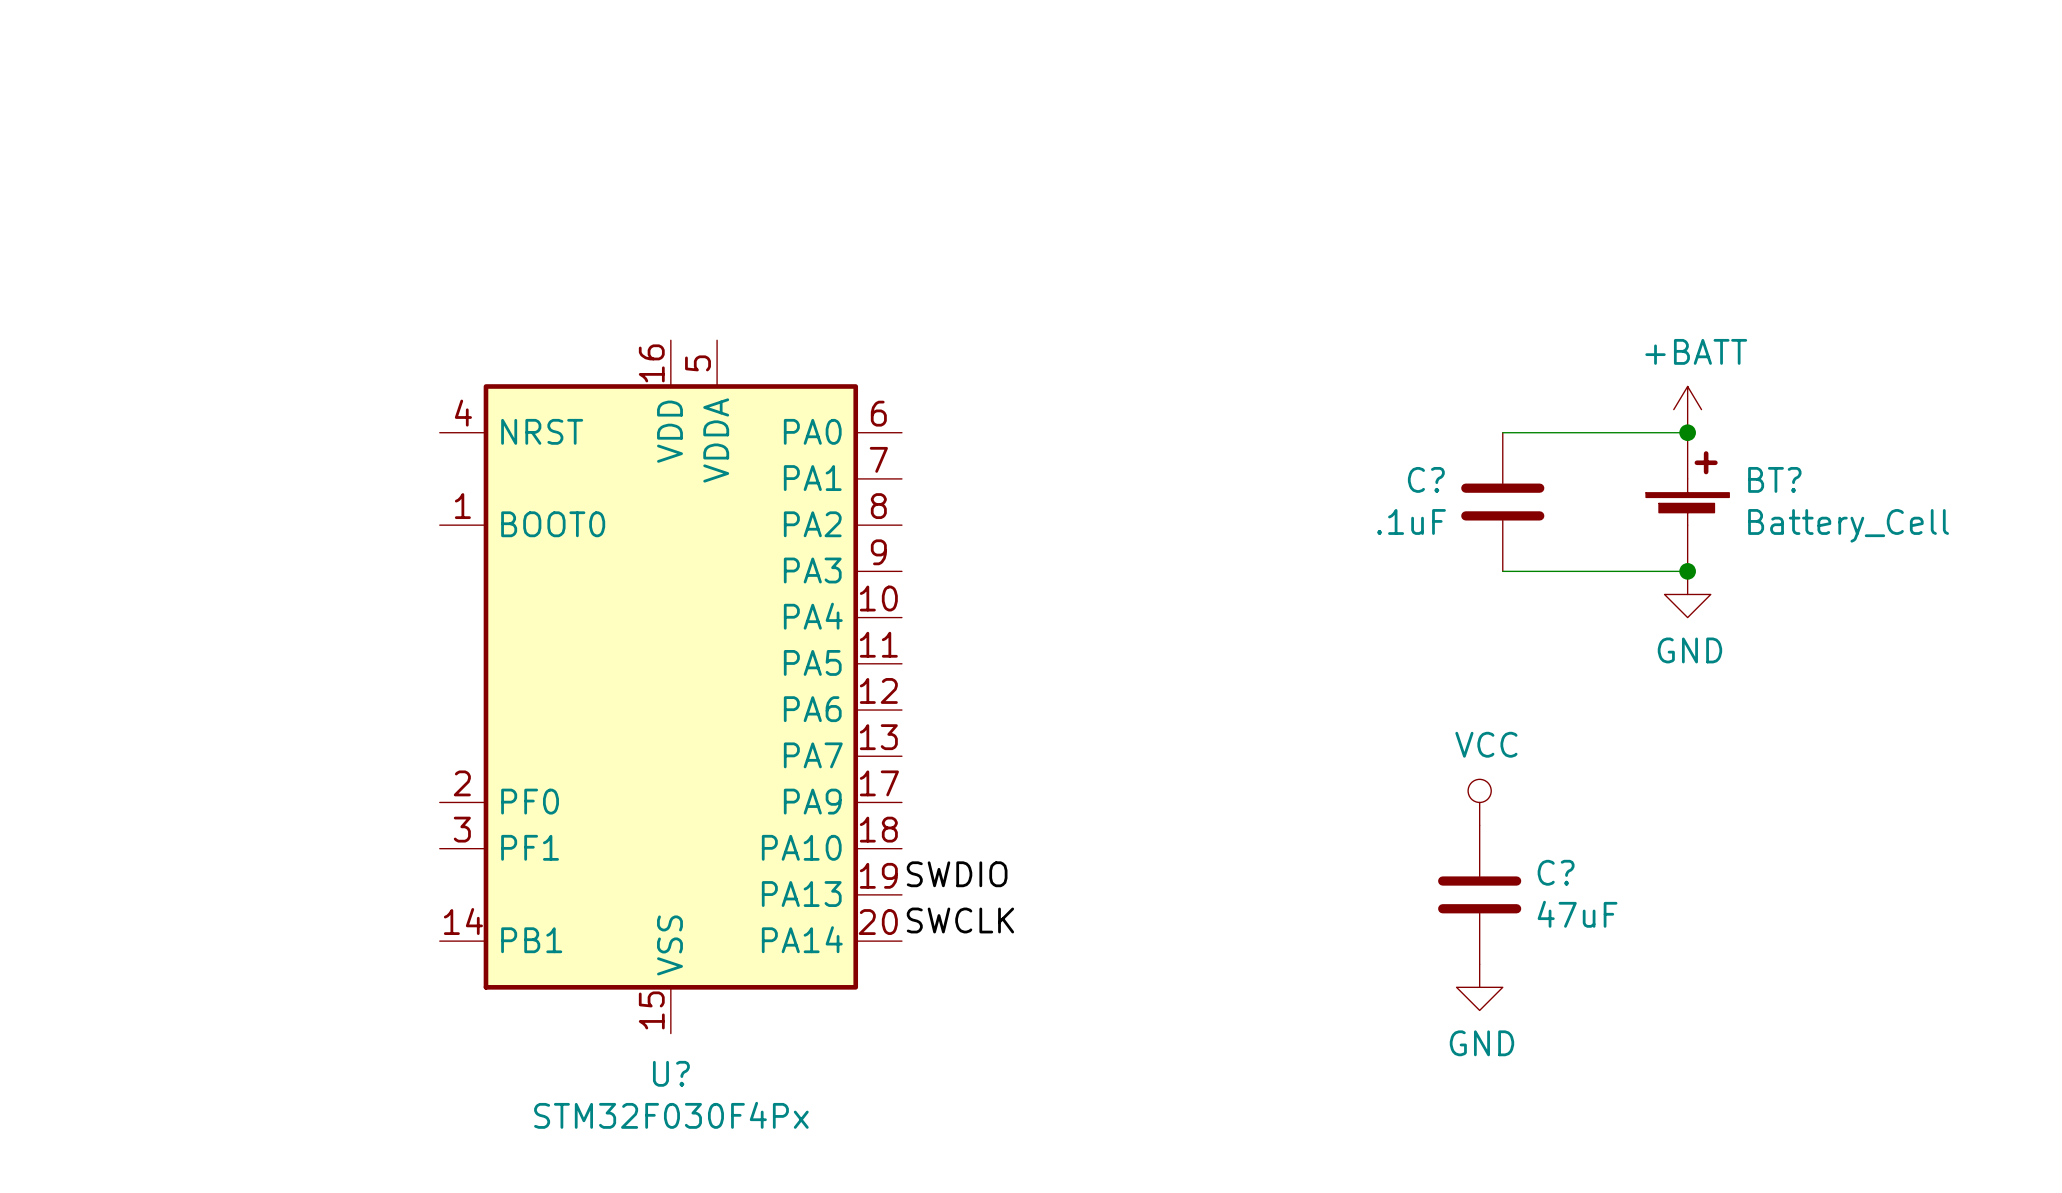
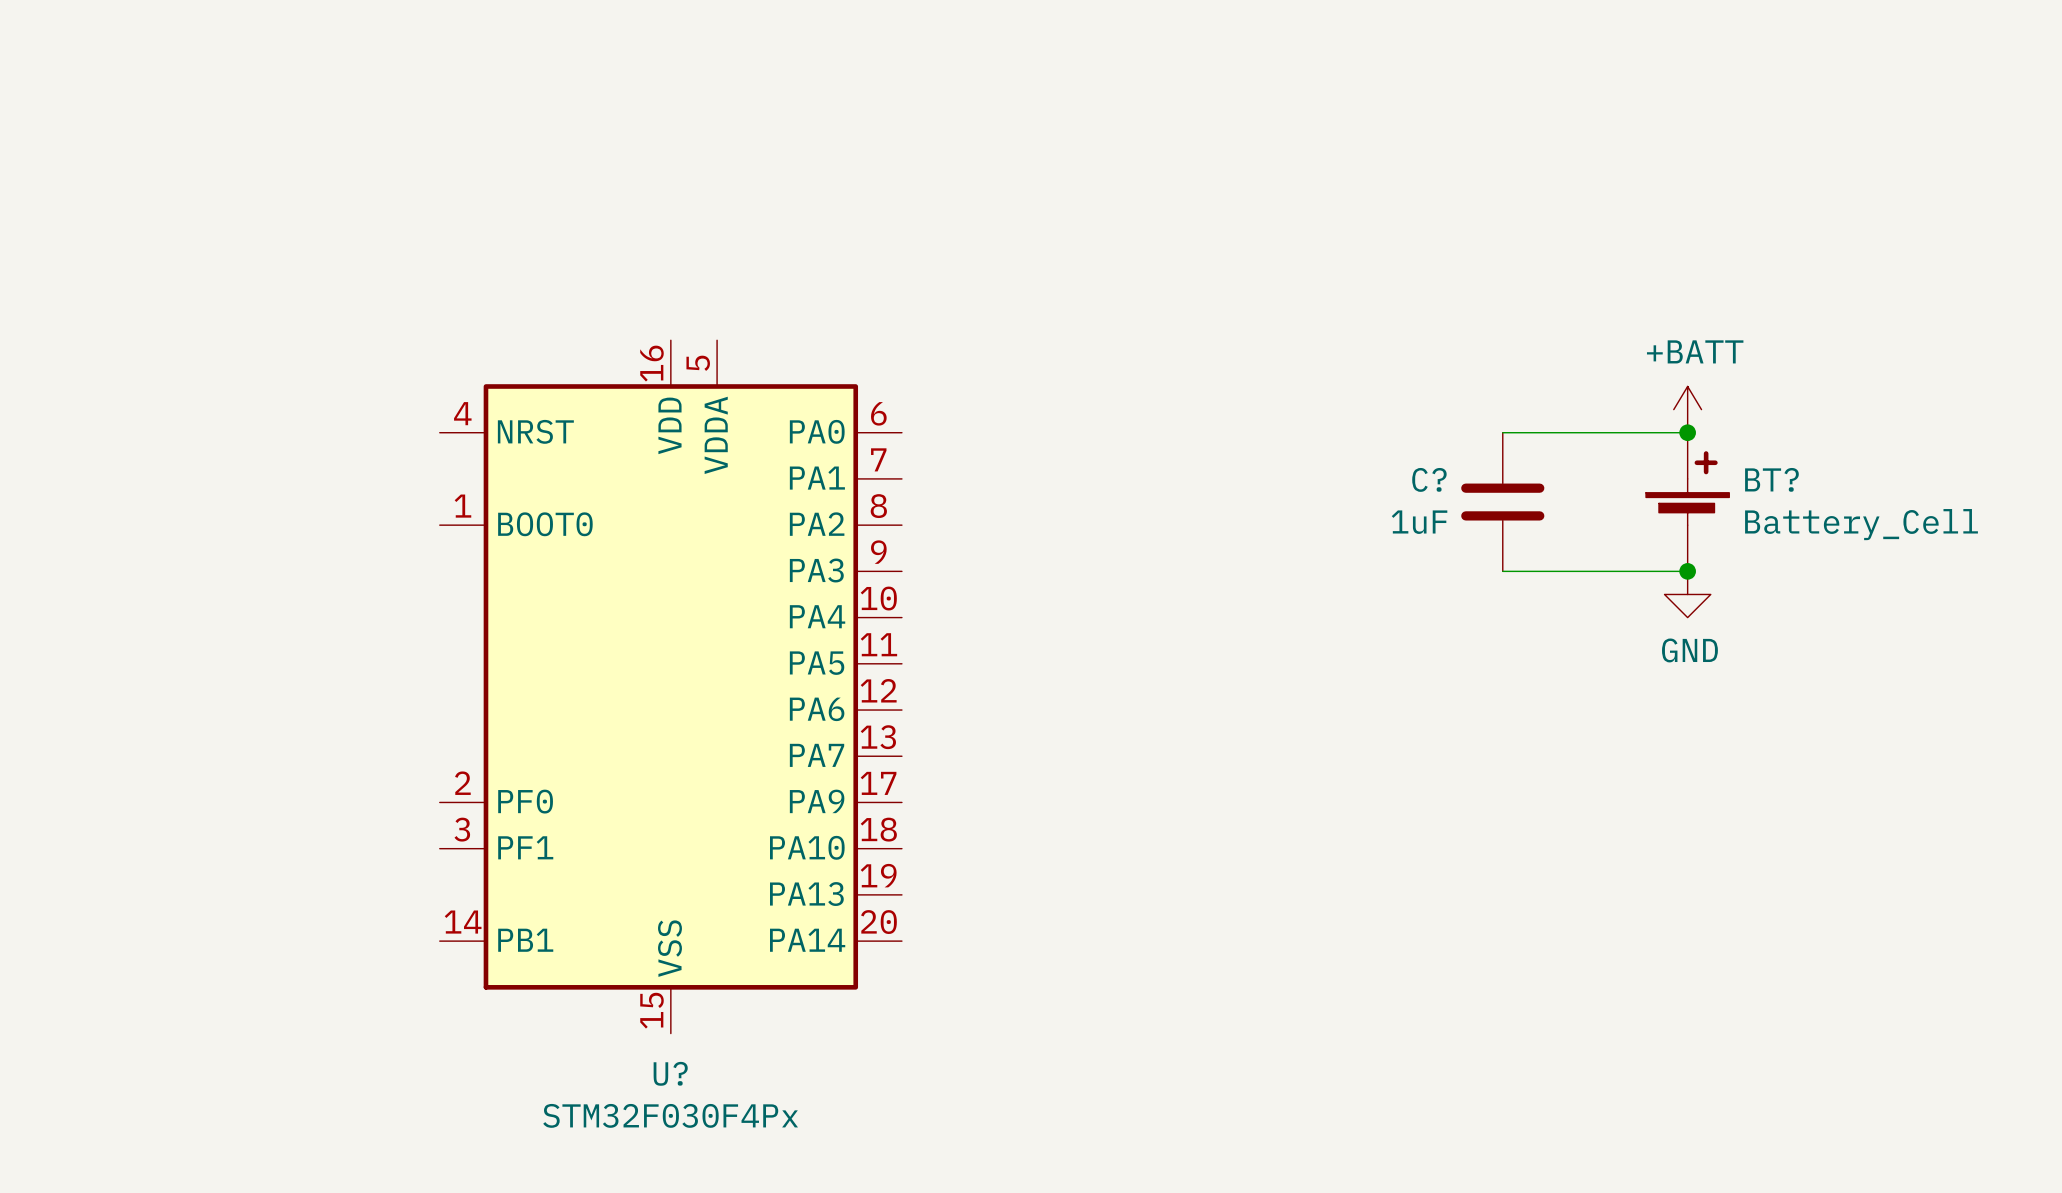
C? value: .1uF (1411, 521) -> 1uF (1419, 522)
power symbol: VCC (1479, 802) -> none
label: SWDIO (957, 874) -> none
C?: 47uF (1479, 894) -> none
label: SWCLK (960, 920) -> none
power symbol: GND (1479, 987) -> none

